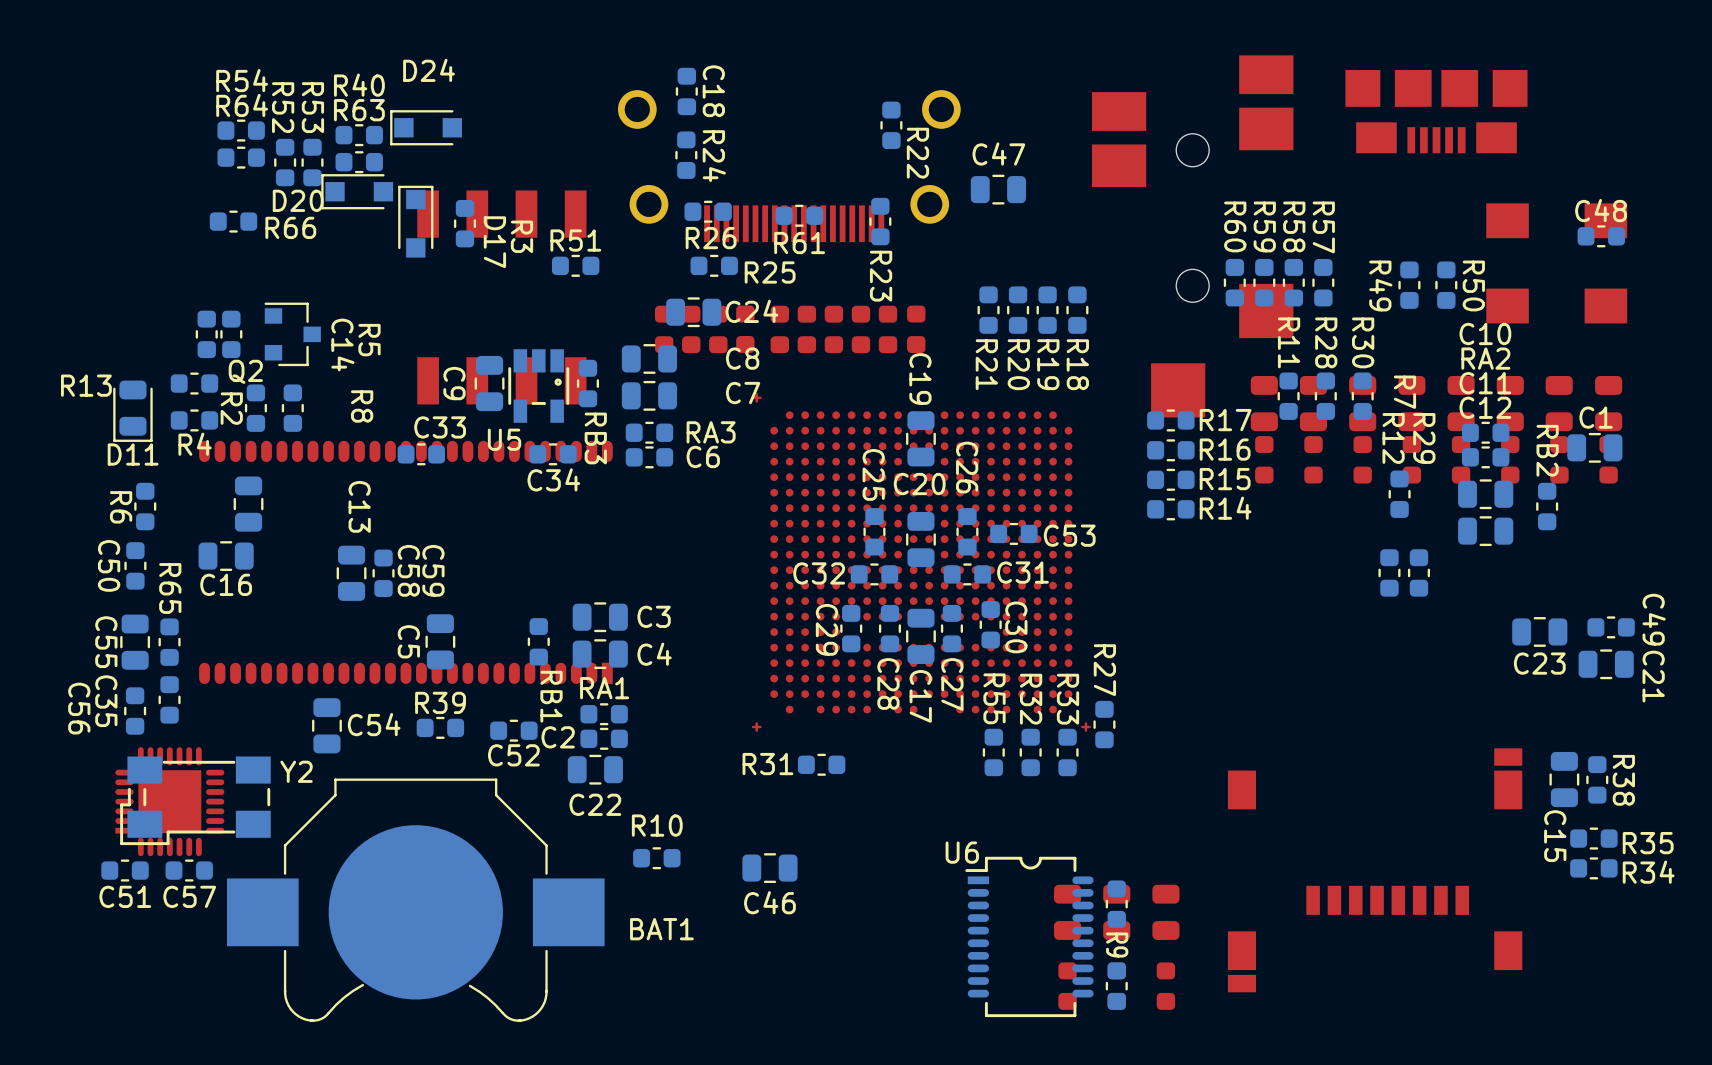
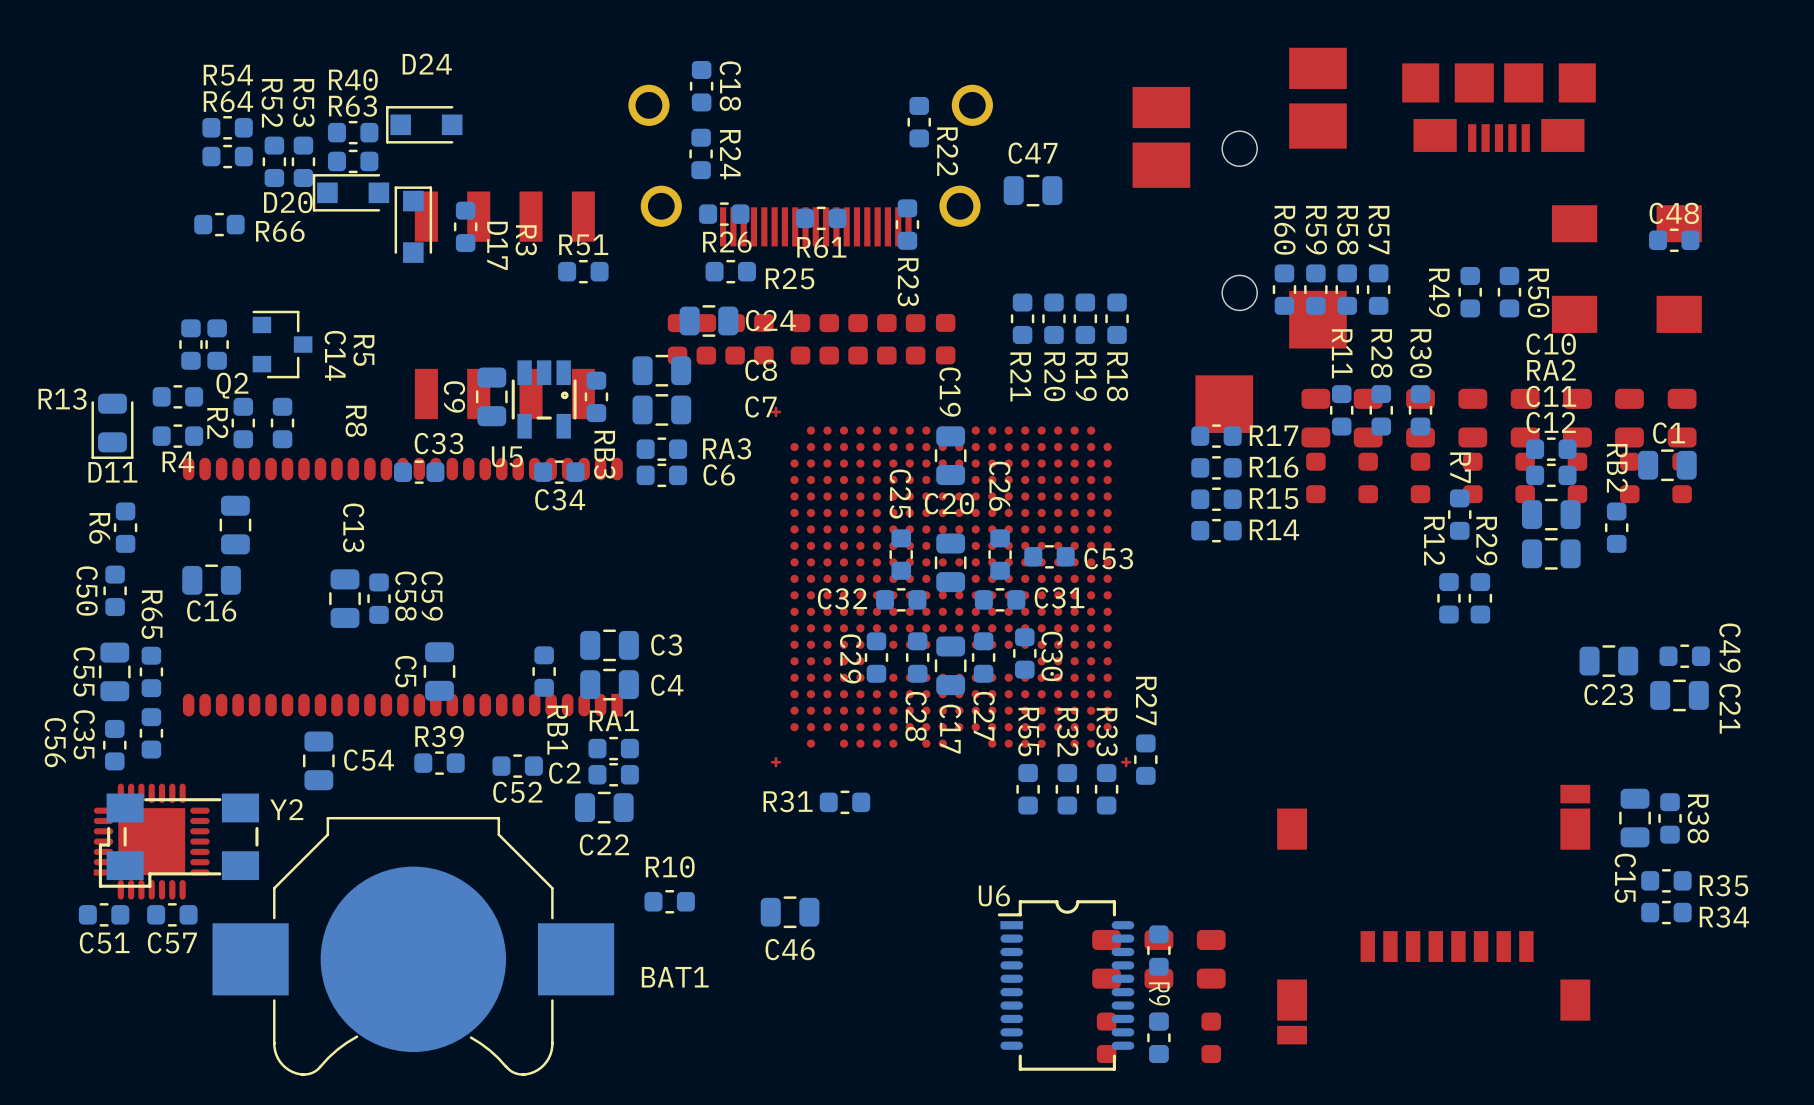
R7 name position: R7 (1404, 392) -> R7 (1460, 467)
R12 name position: R12 (1393, 438) -> R12 (1434, 541)
R29 name position: R29 (1424, 438) -> R29 (1486, 541)

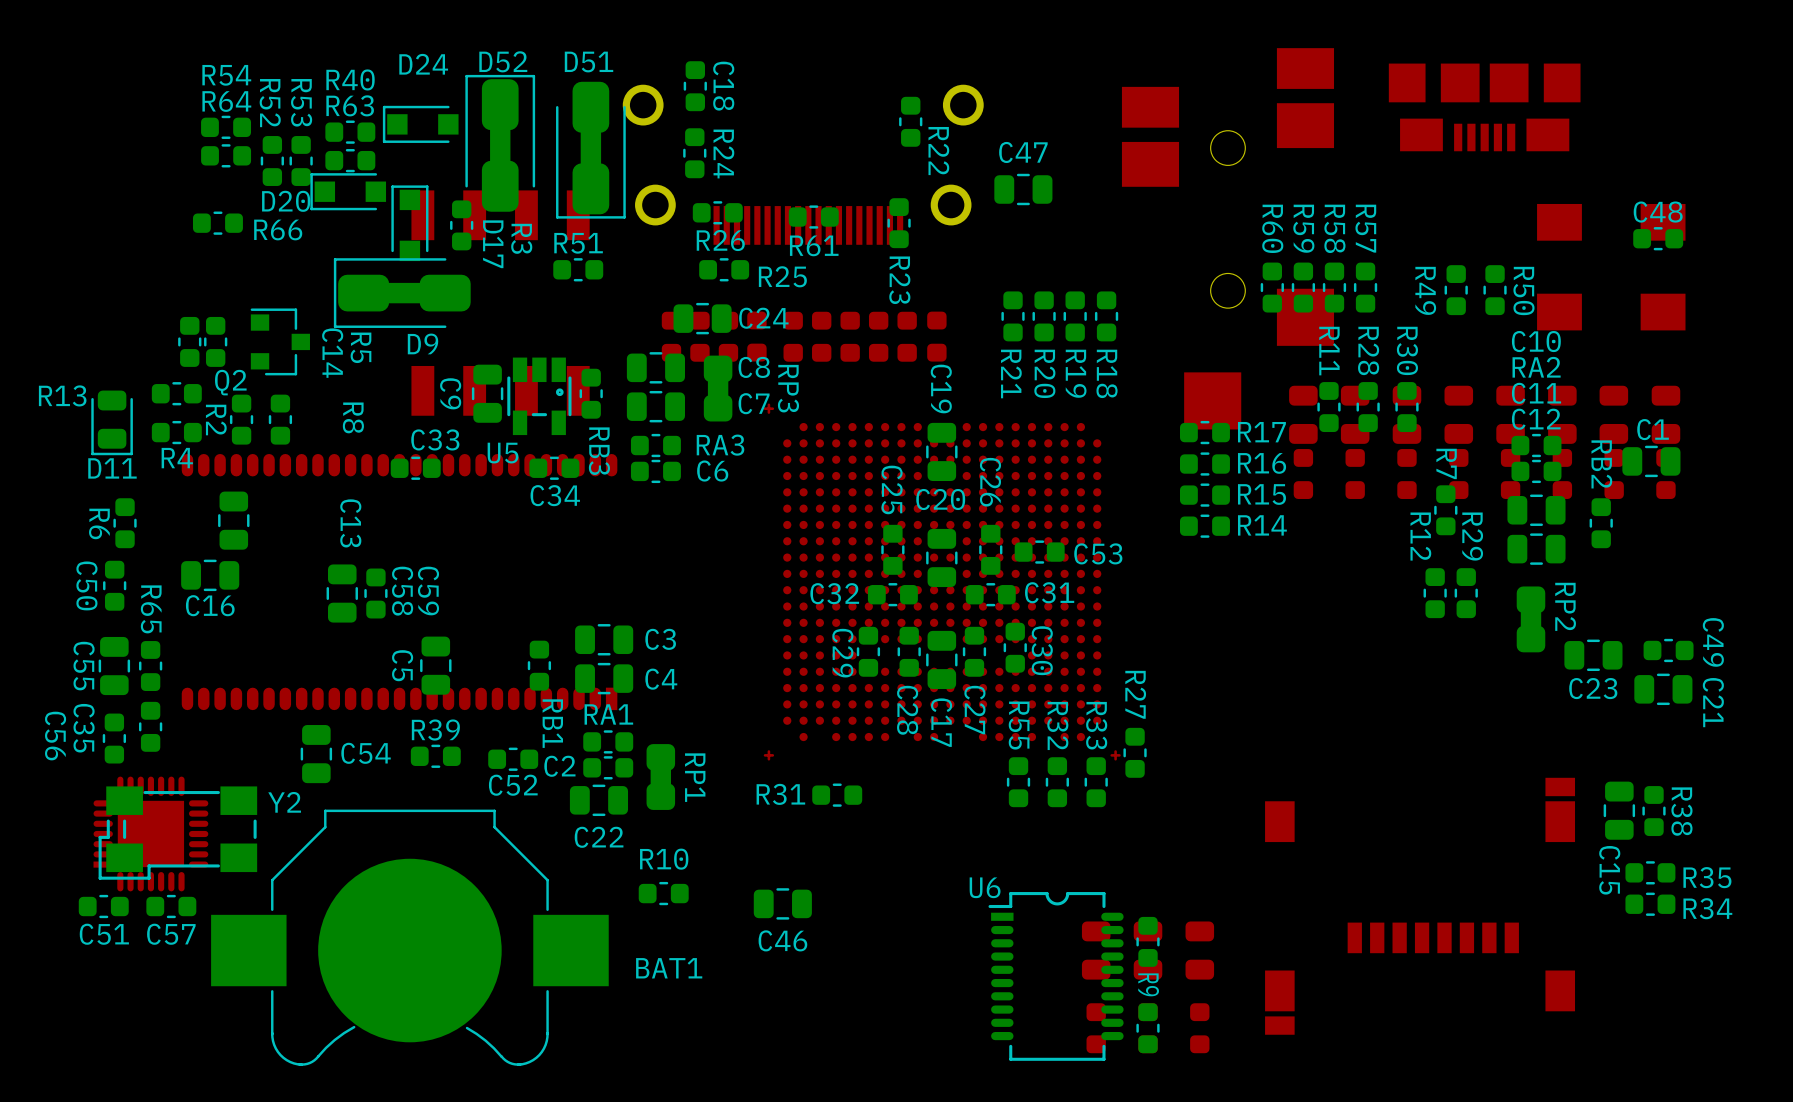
D52: none -> (500, 143)
D51: none -> (590, 150)
D9: none -> (402, 293)
RP3: none -> (718, 388)
RP2: none -> (1530, 619)
RP1: none -> (660, 777)

